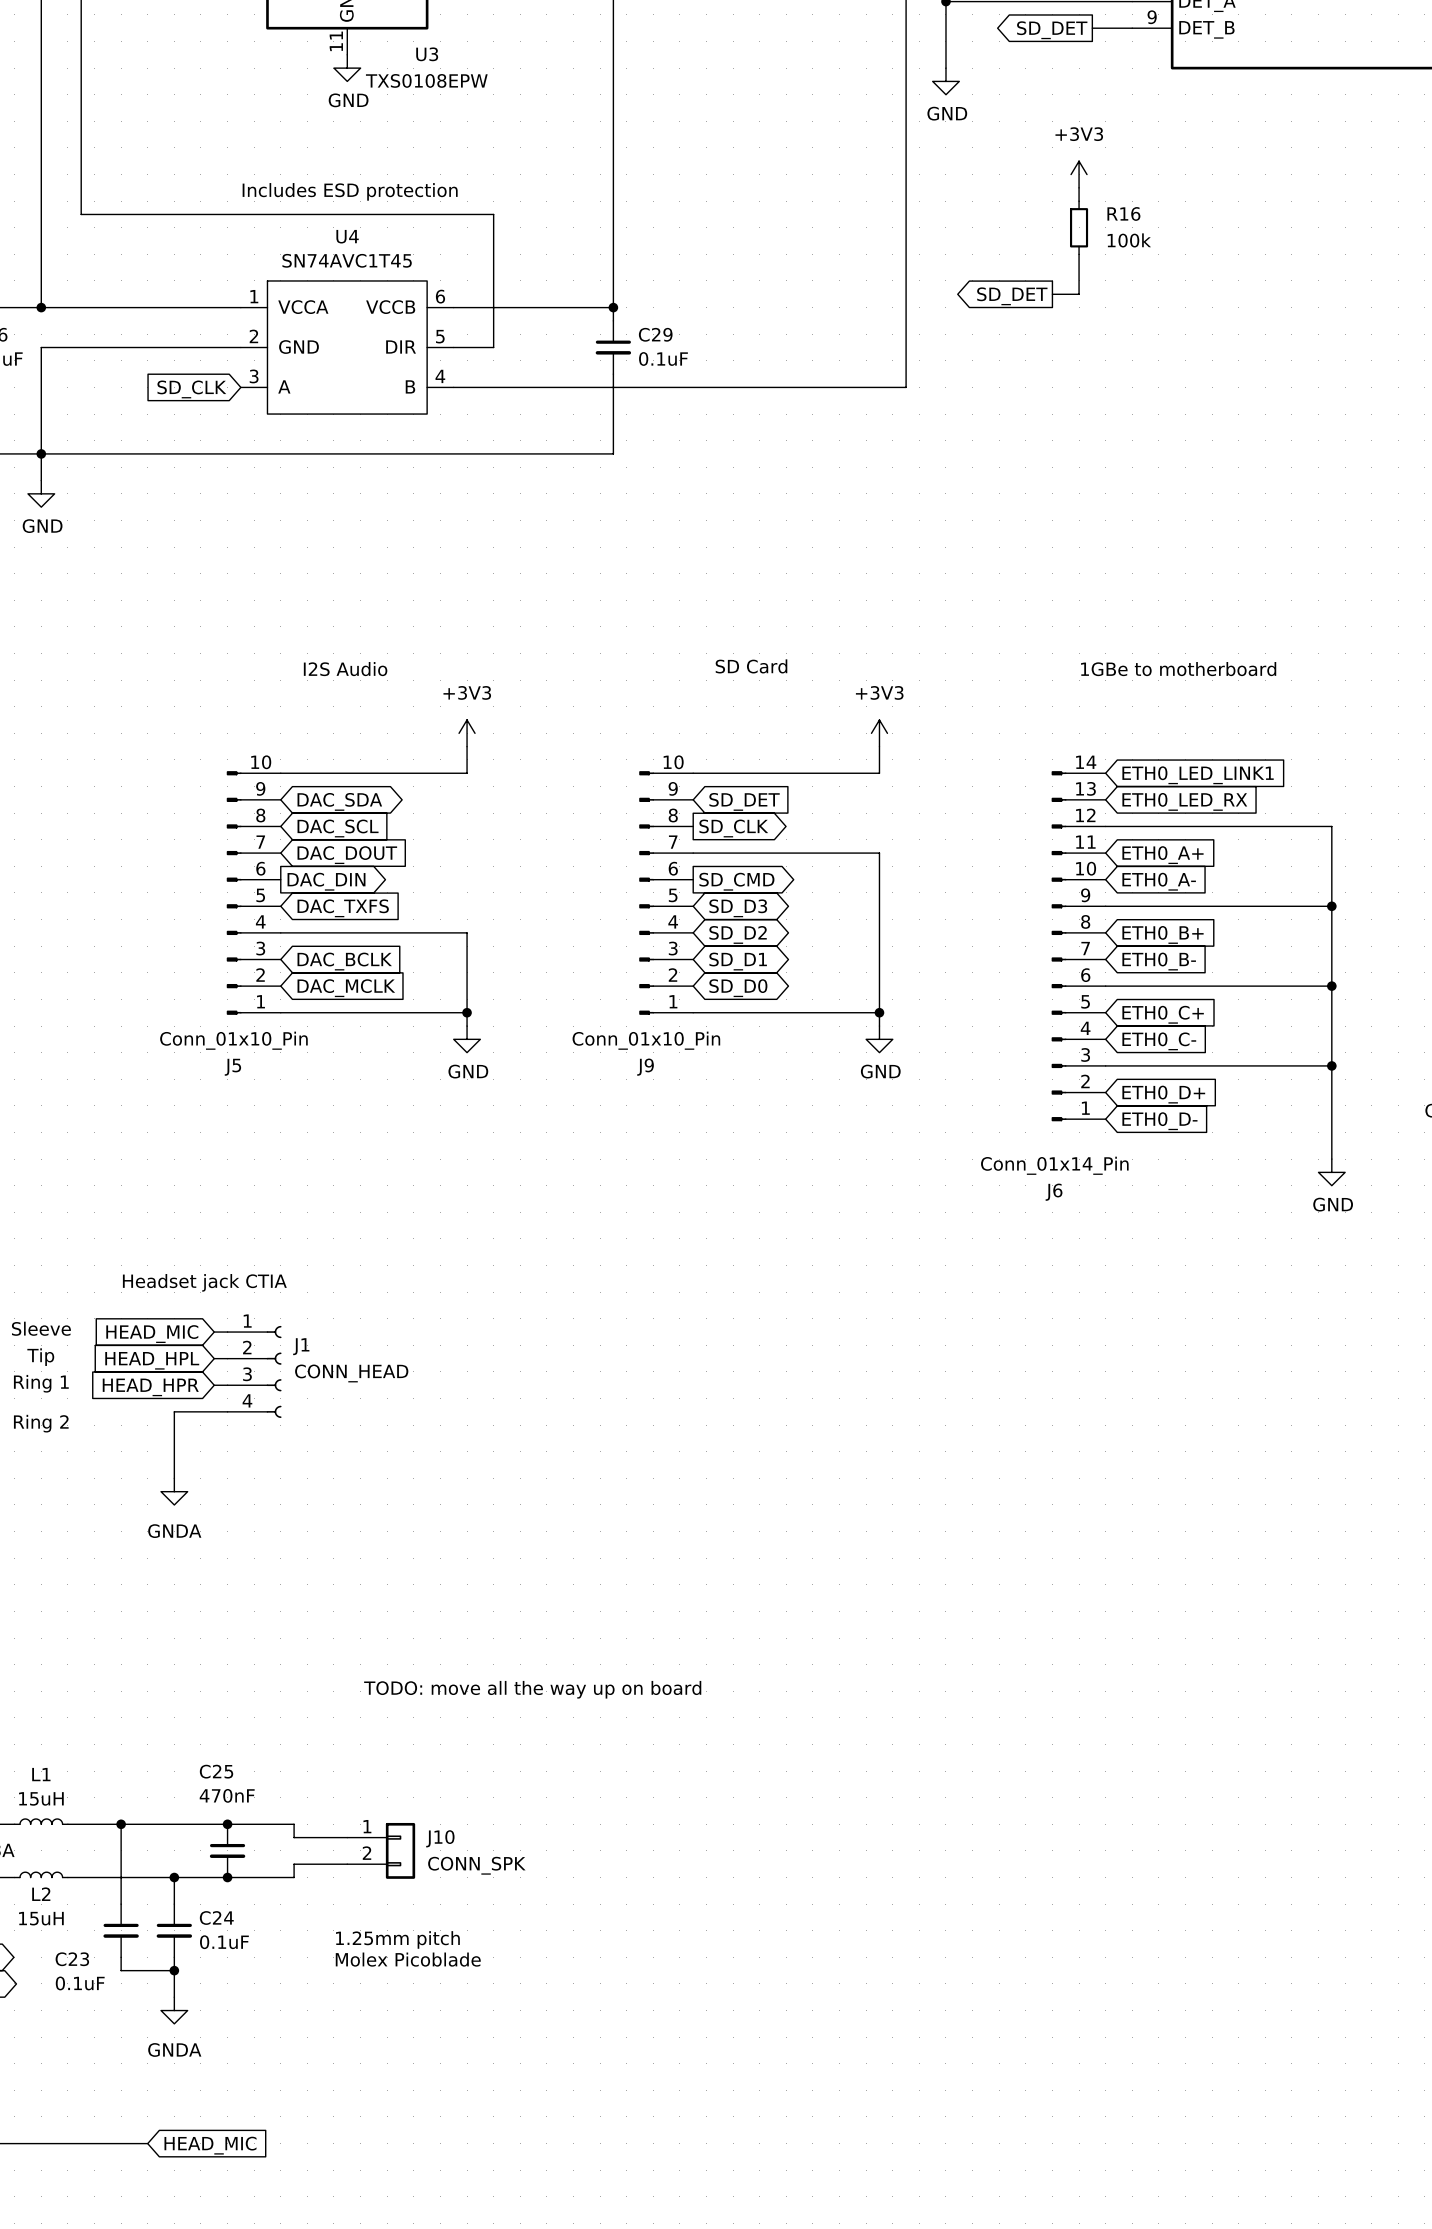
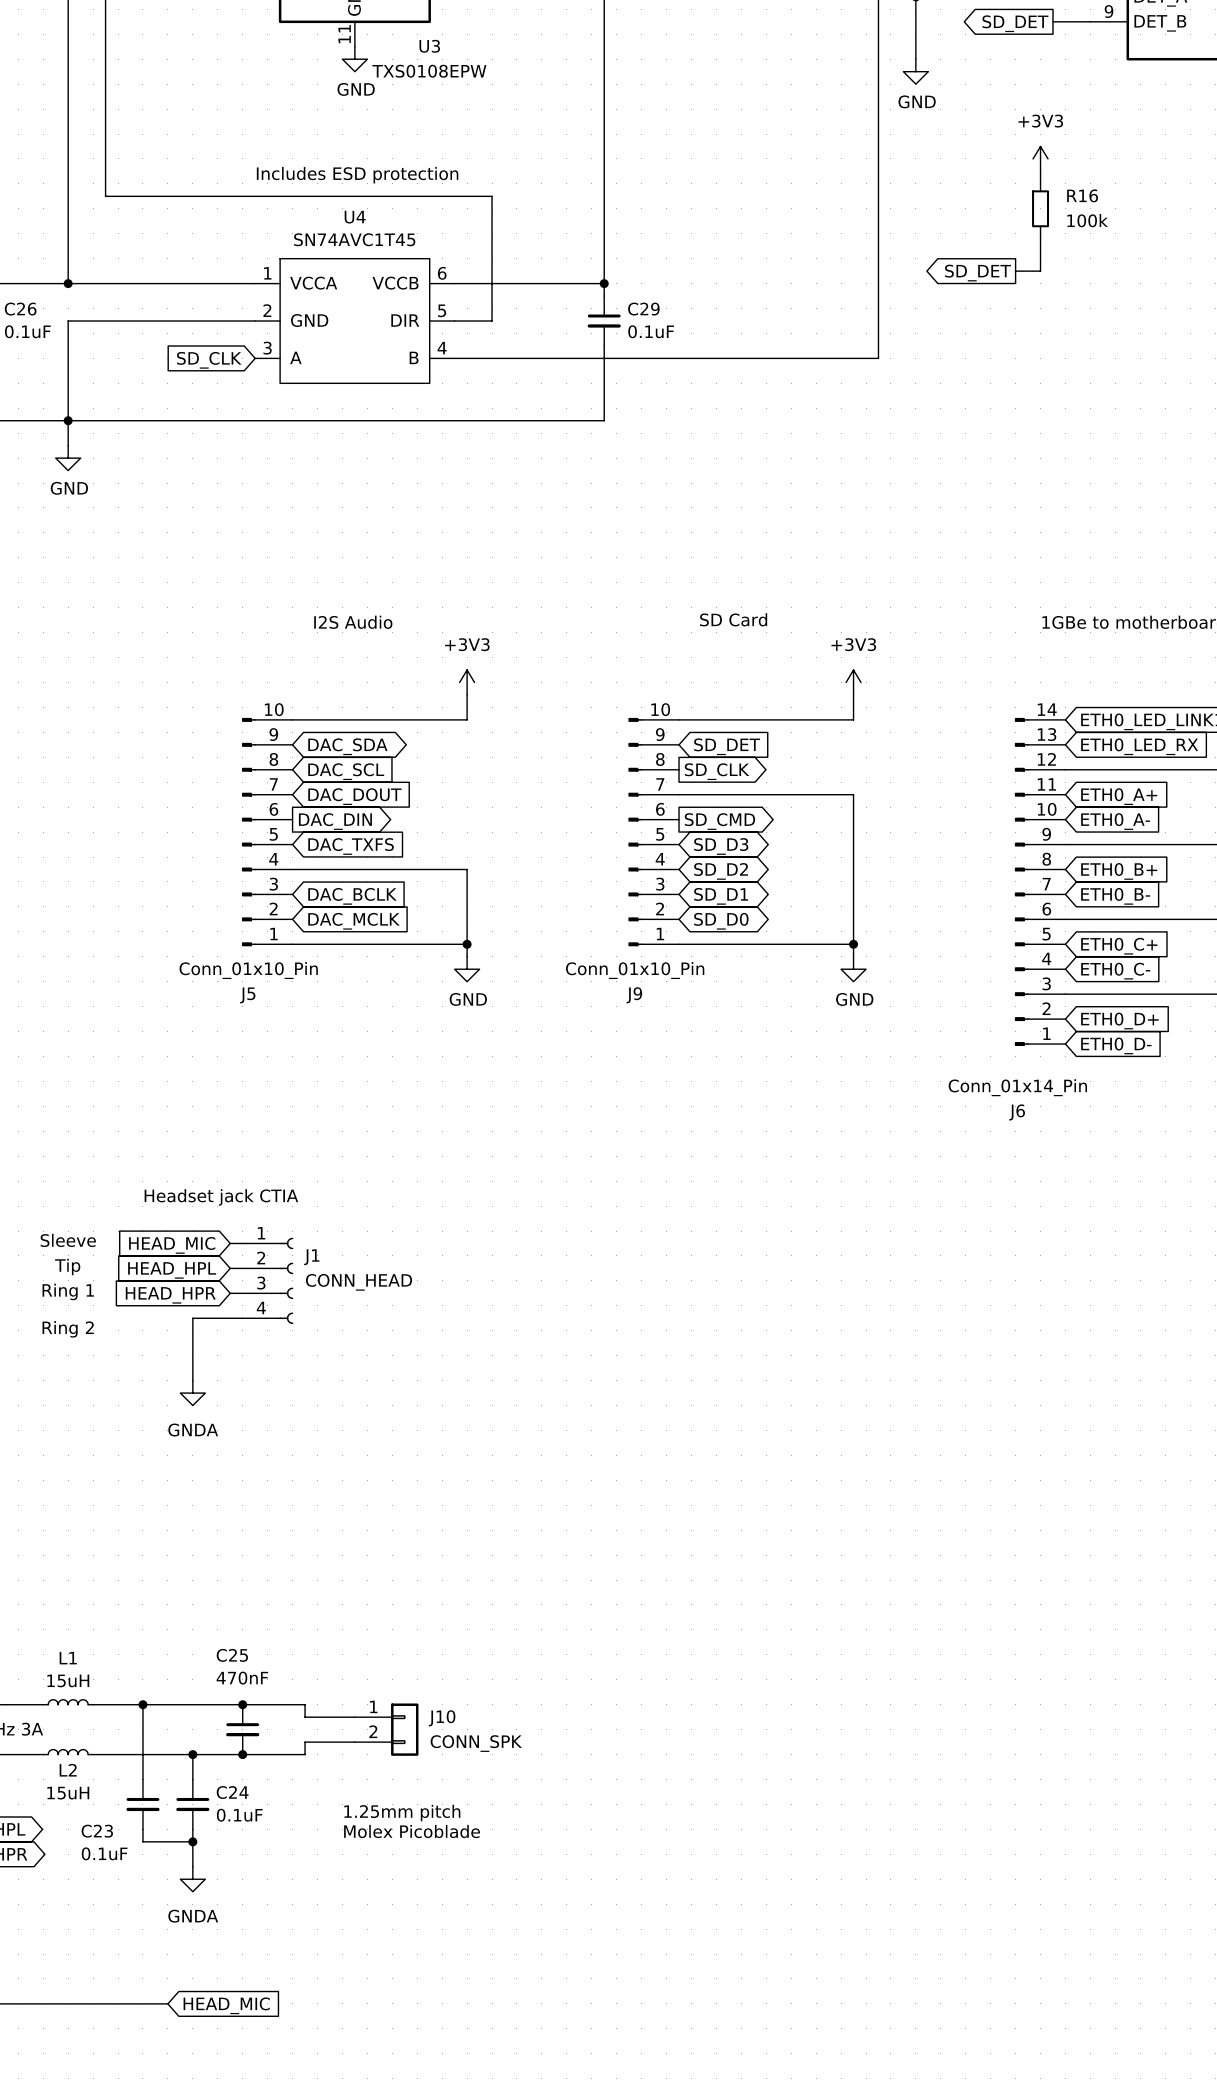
text: TODO: move all the way up on board (532, 1689) -> none

